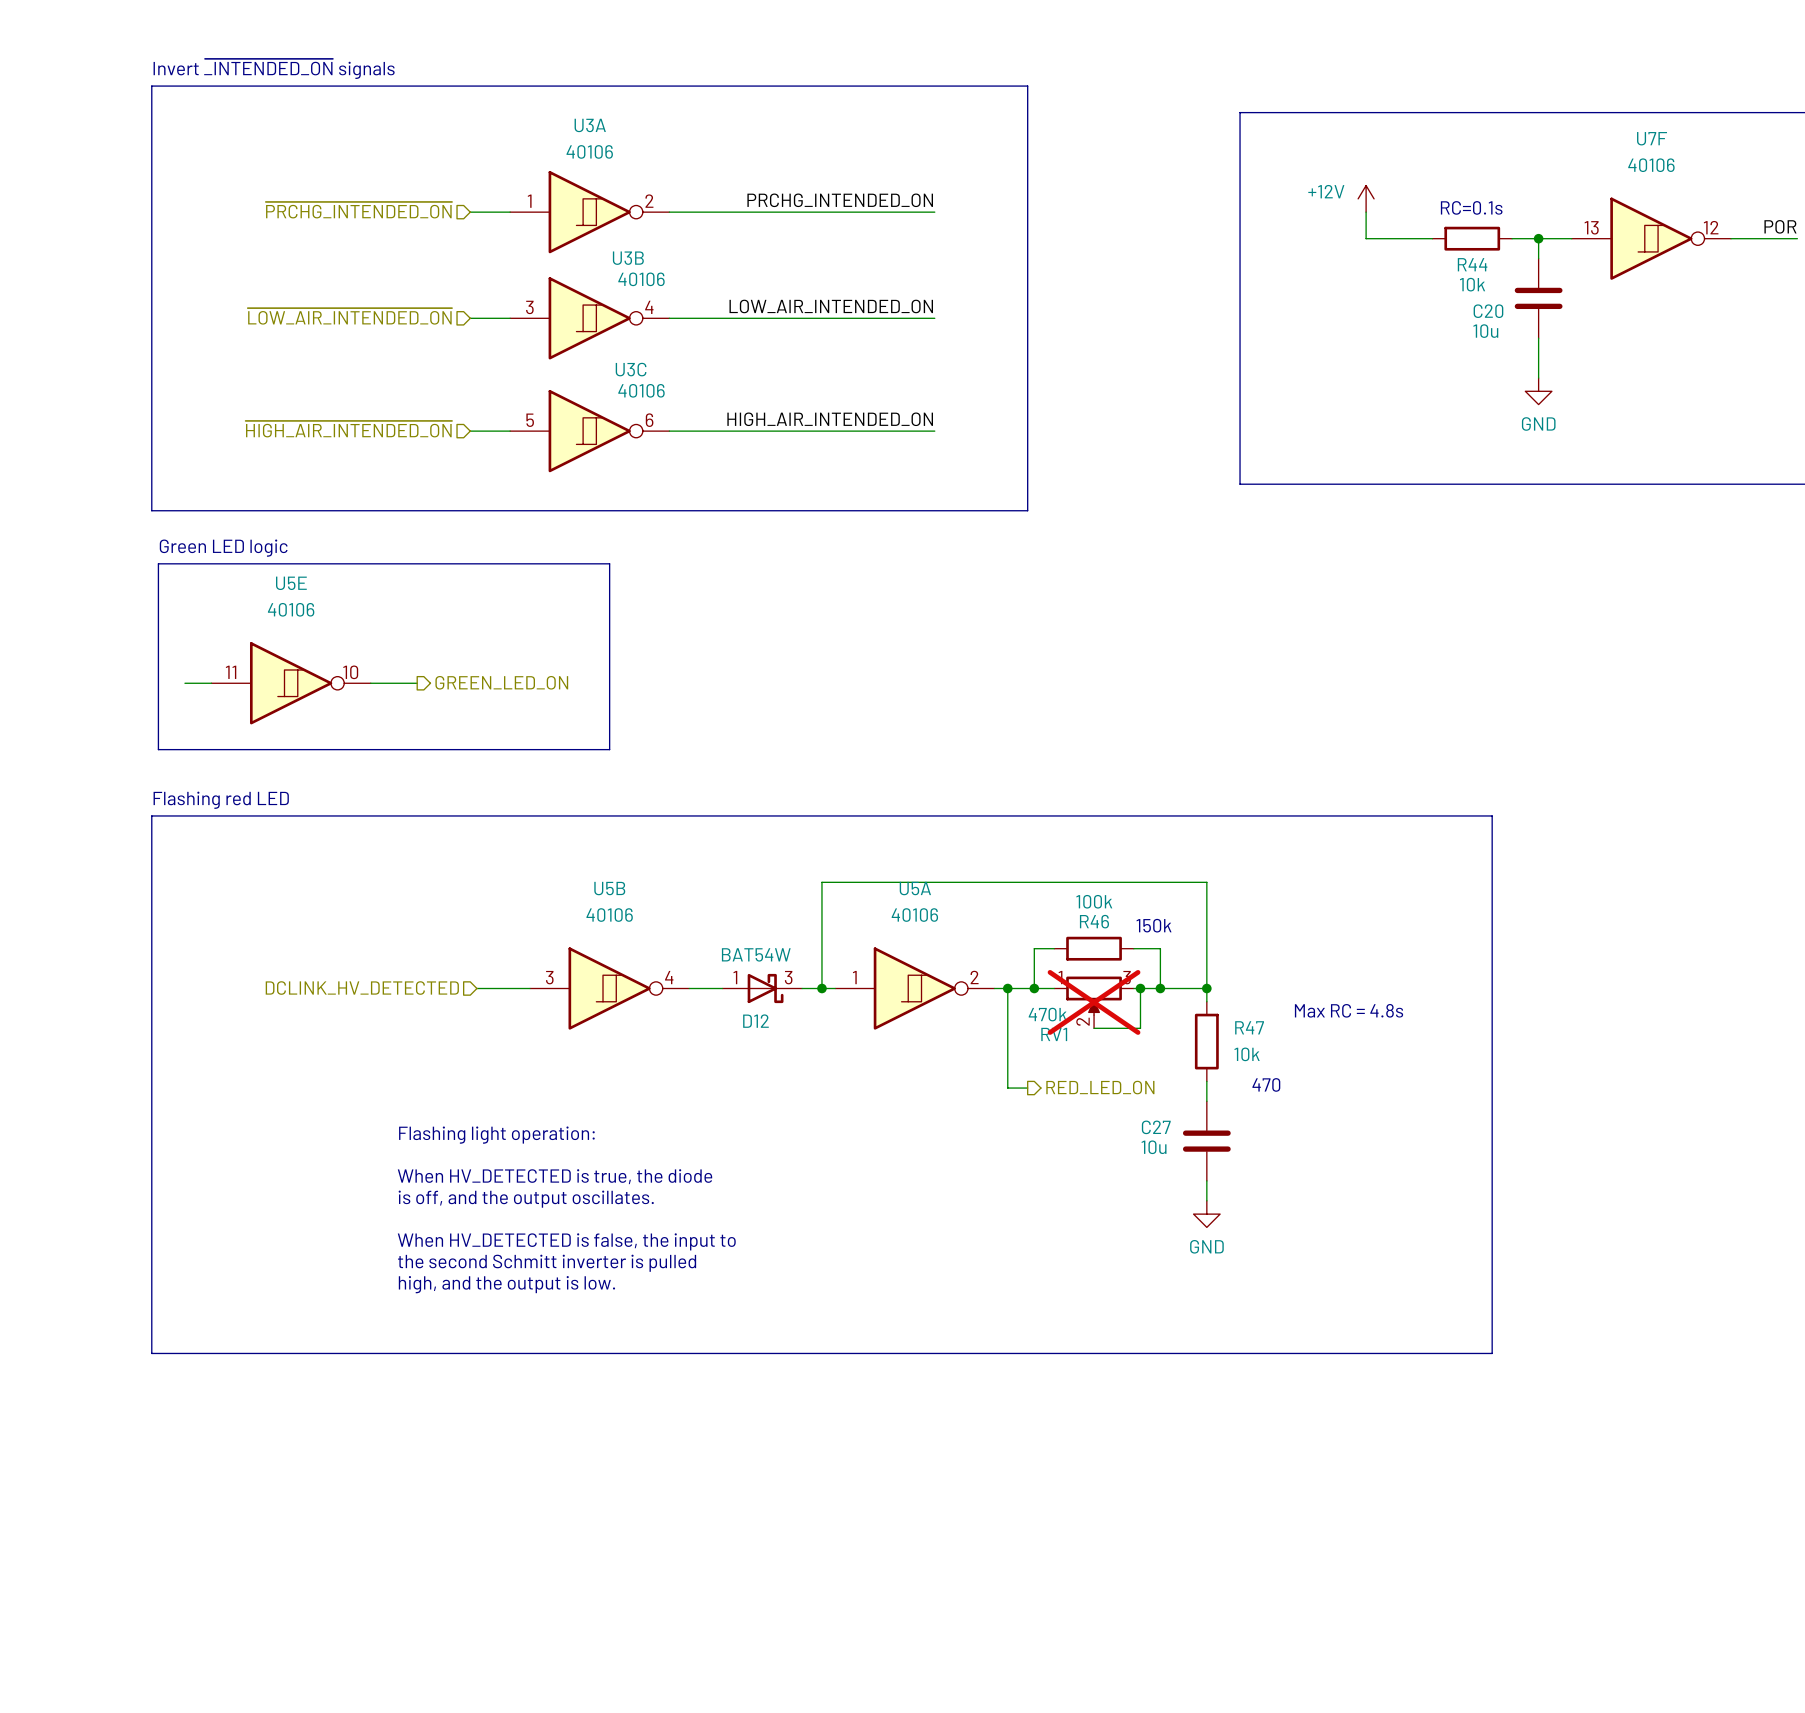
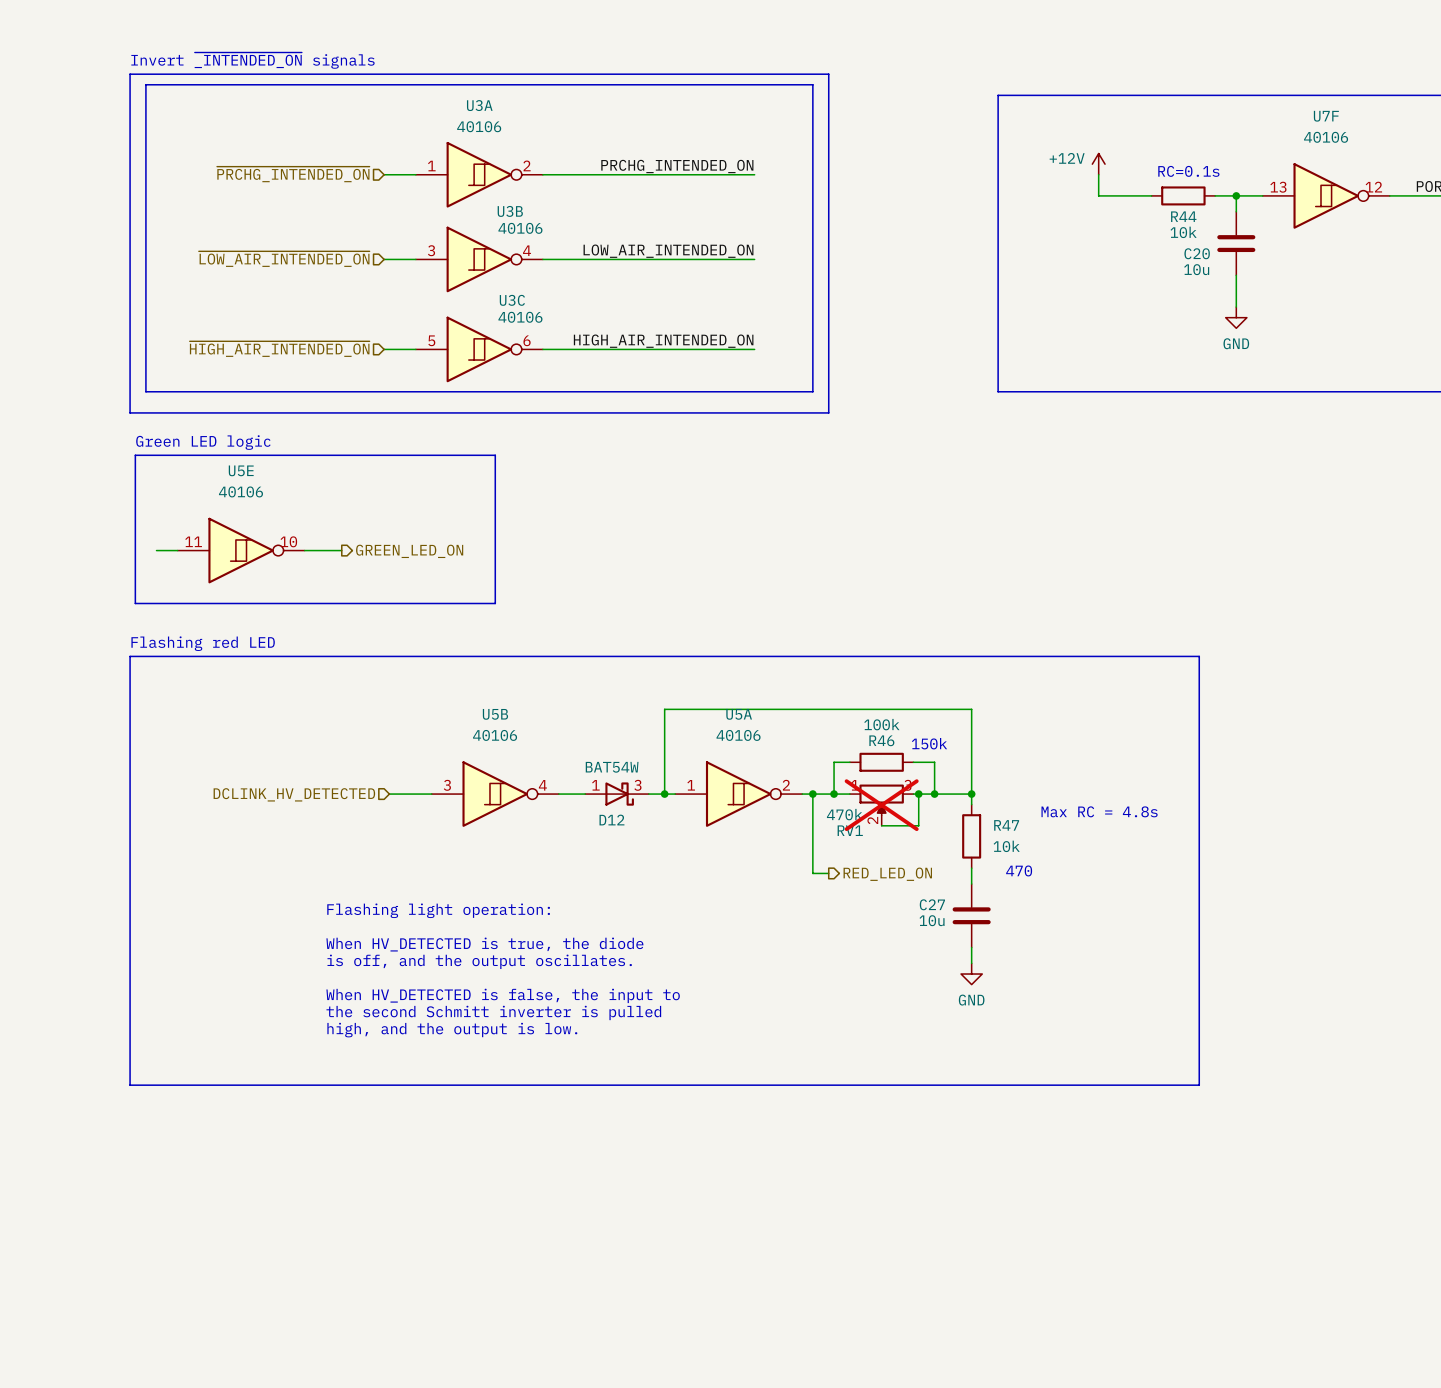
line: none -> (145, 84) (812, 84) (812, 391) (145, 391) (145, 84)

